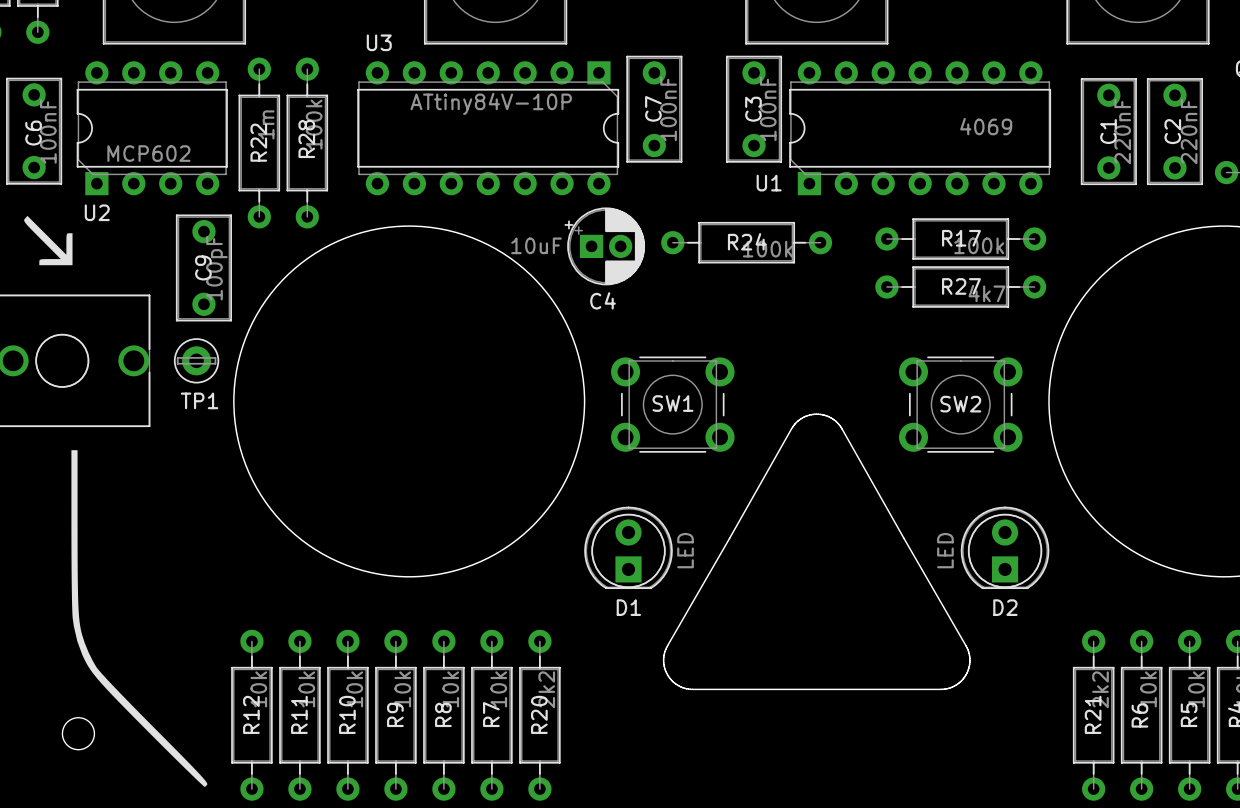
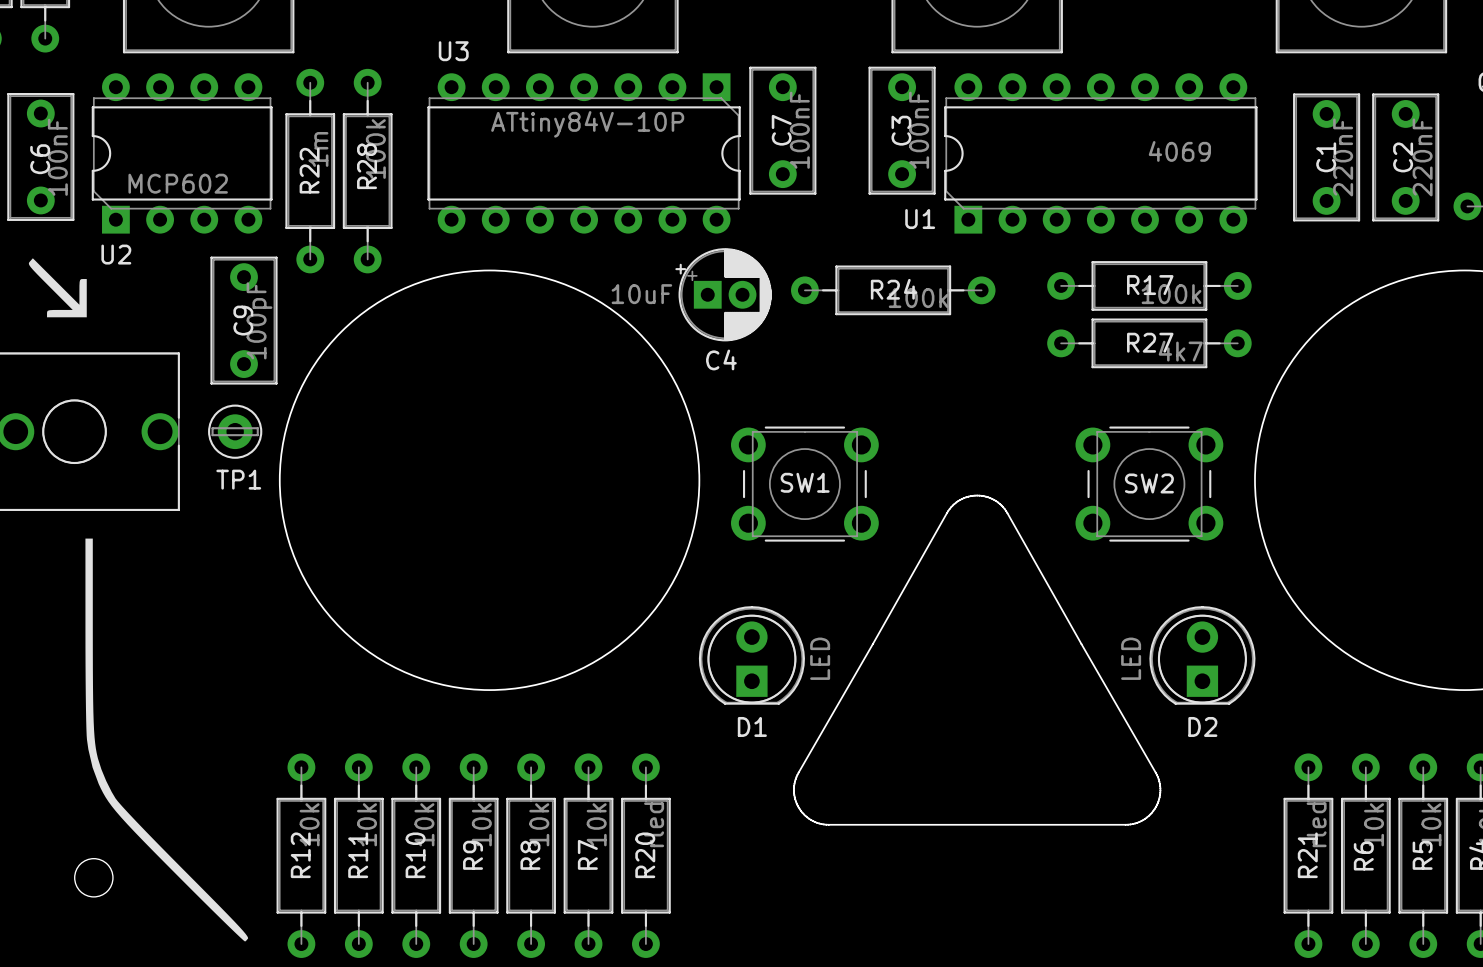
R20 value: 2k2 (546, 689) -> rled (654, 824)
R21 value: 2k2 (1100, 689) -> rled (1316, 824)

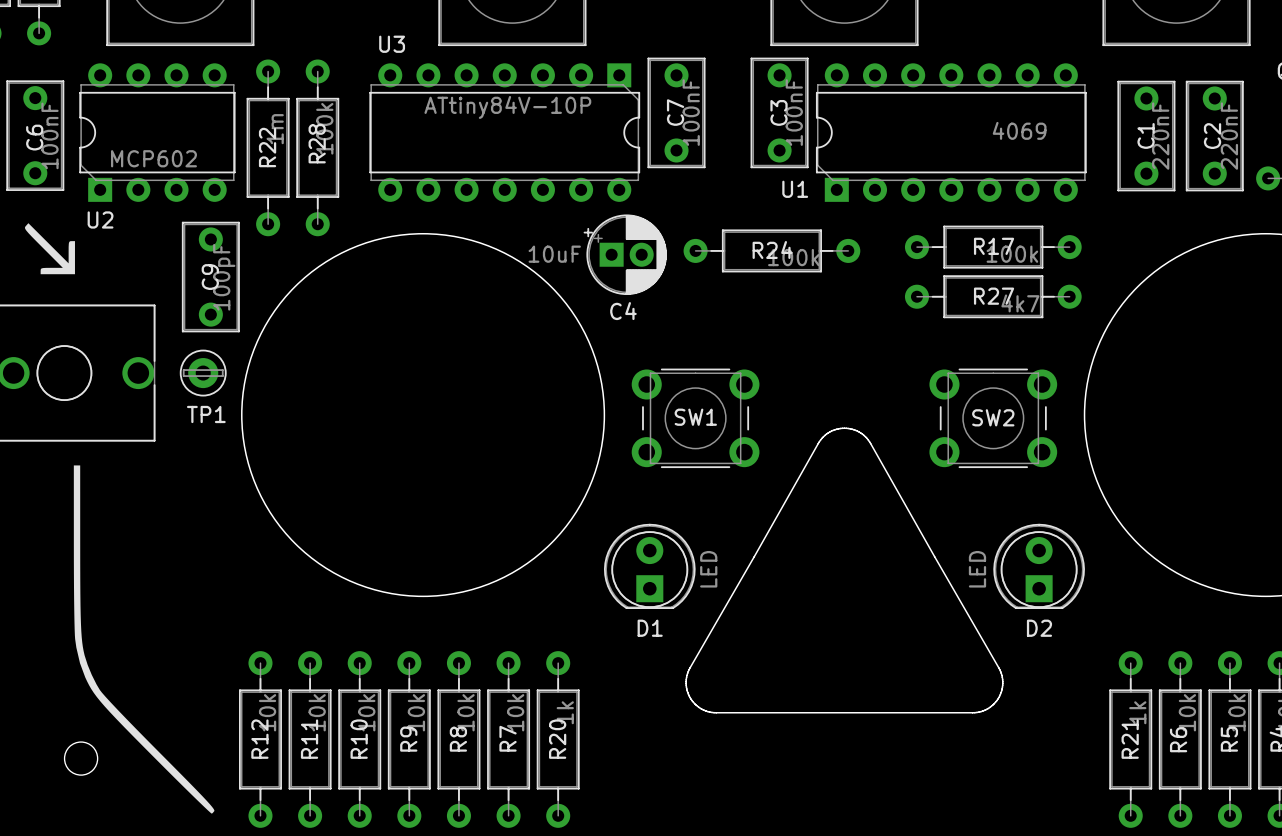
R20 value: rled (654, 824) -> 1k (565, 712)
R21 value: rled (1316, 824) -> 1k (1137, 712)

